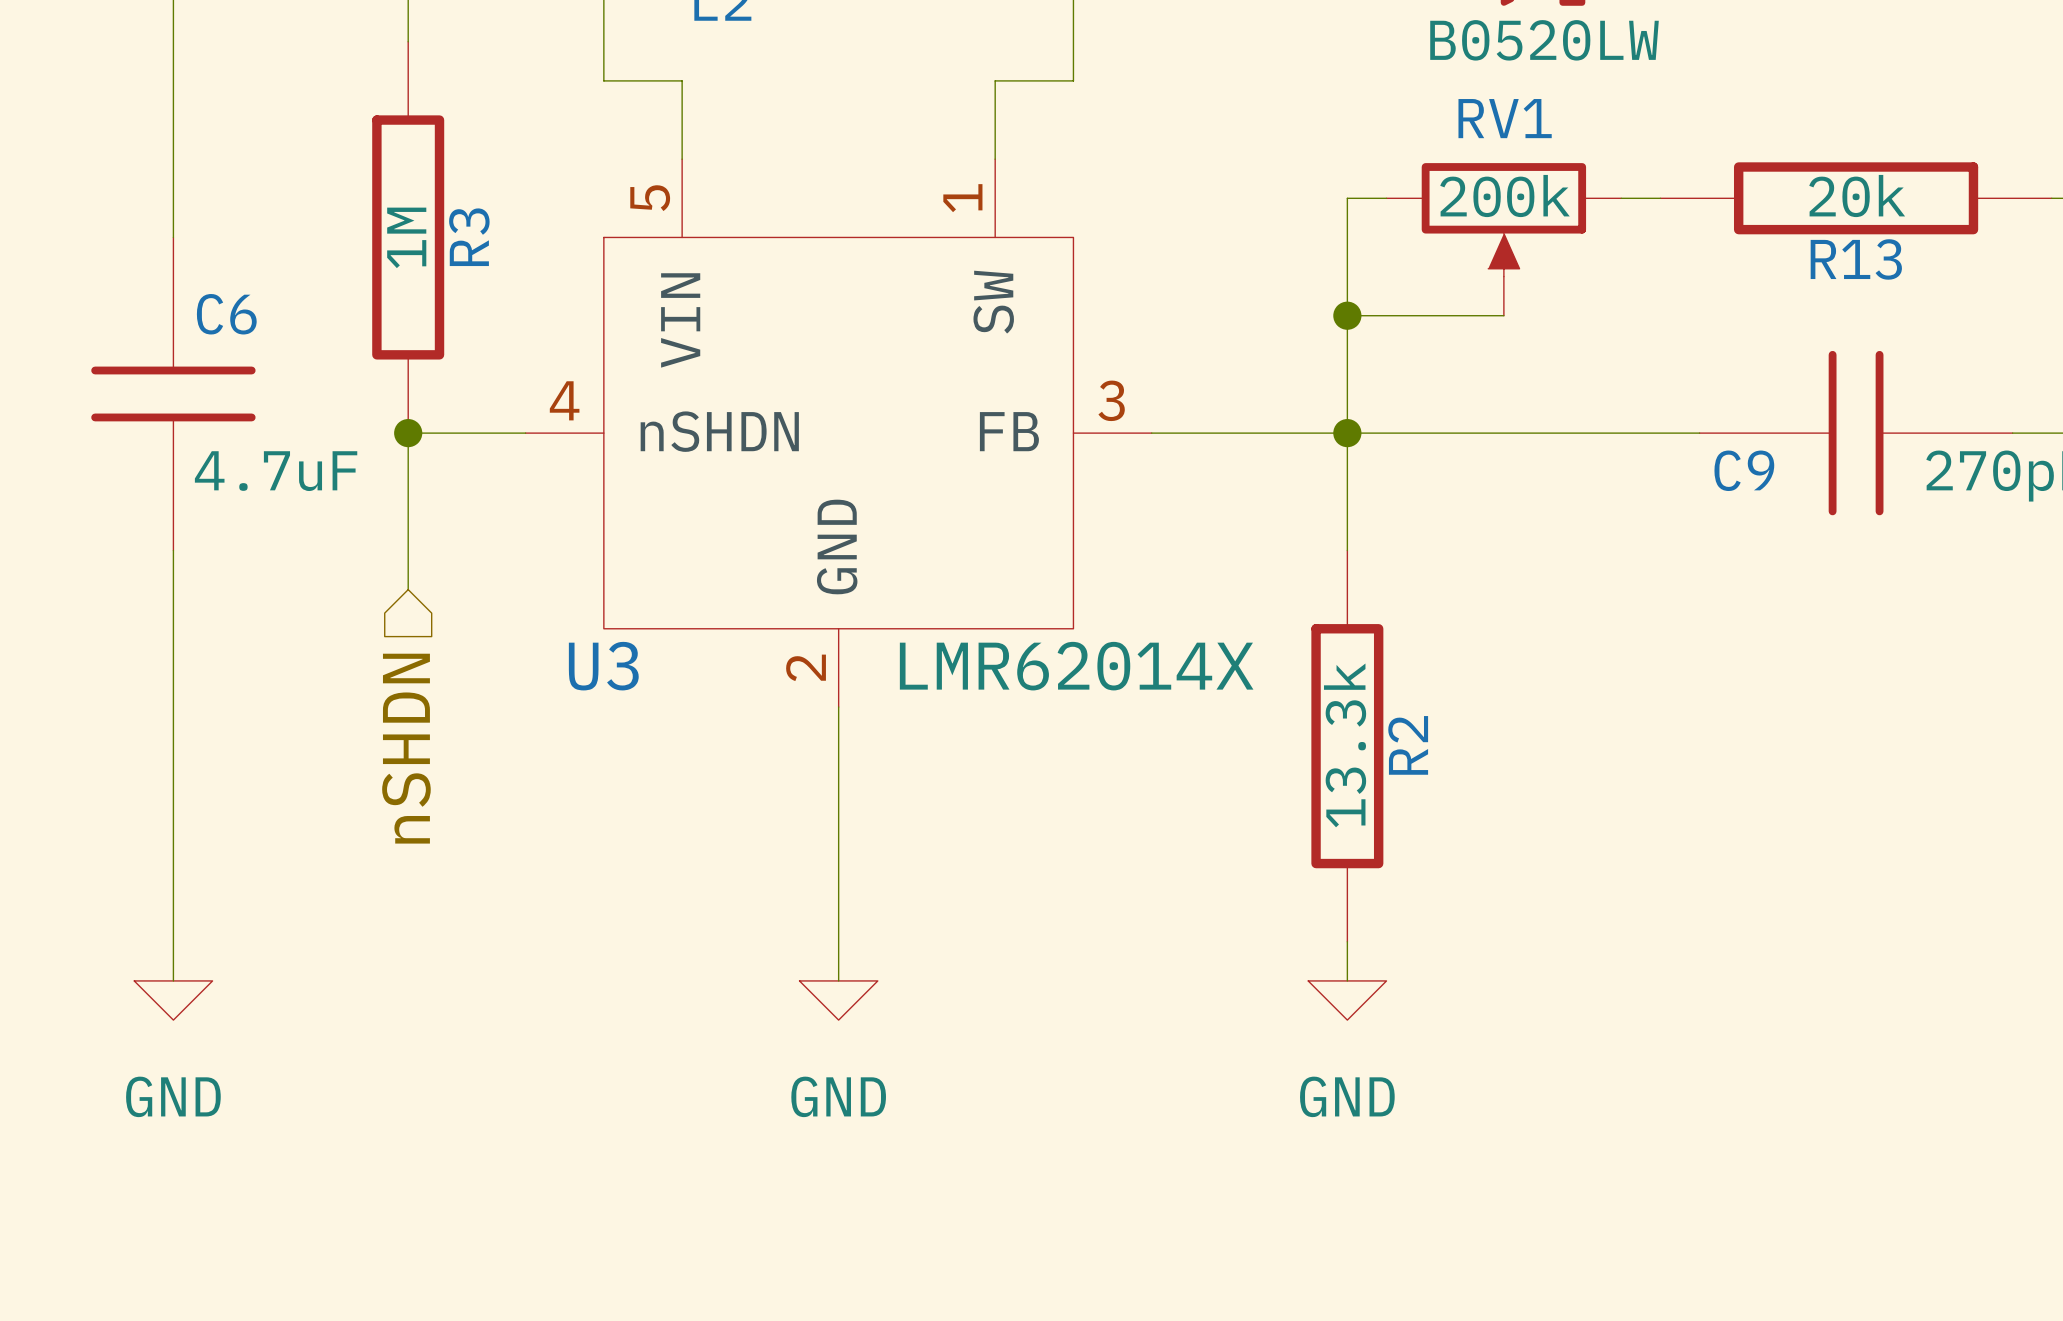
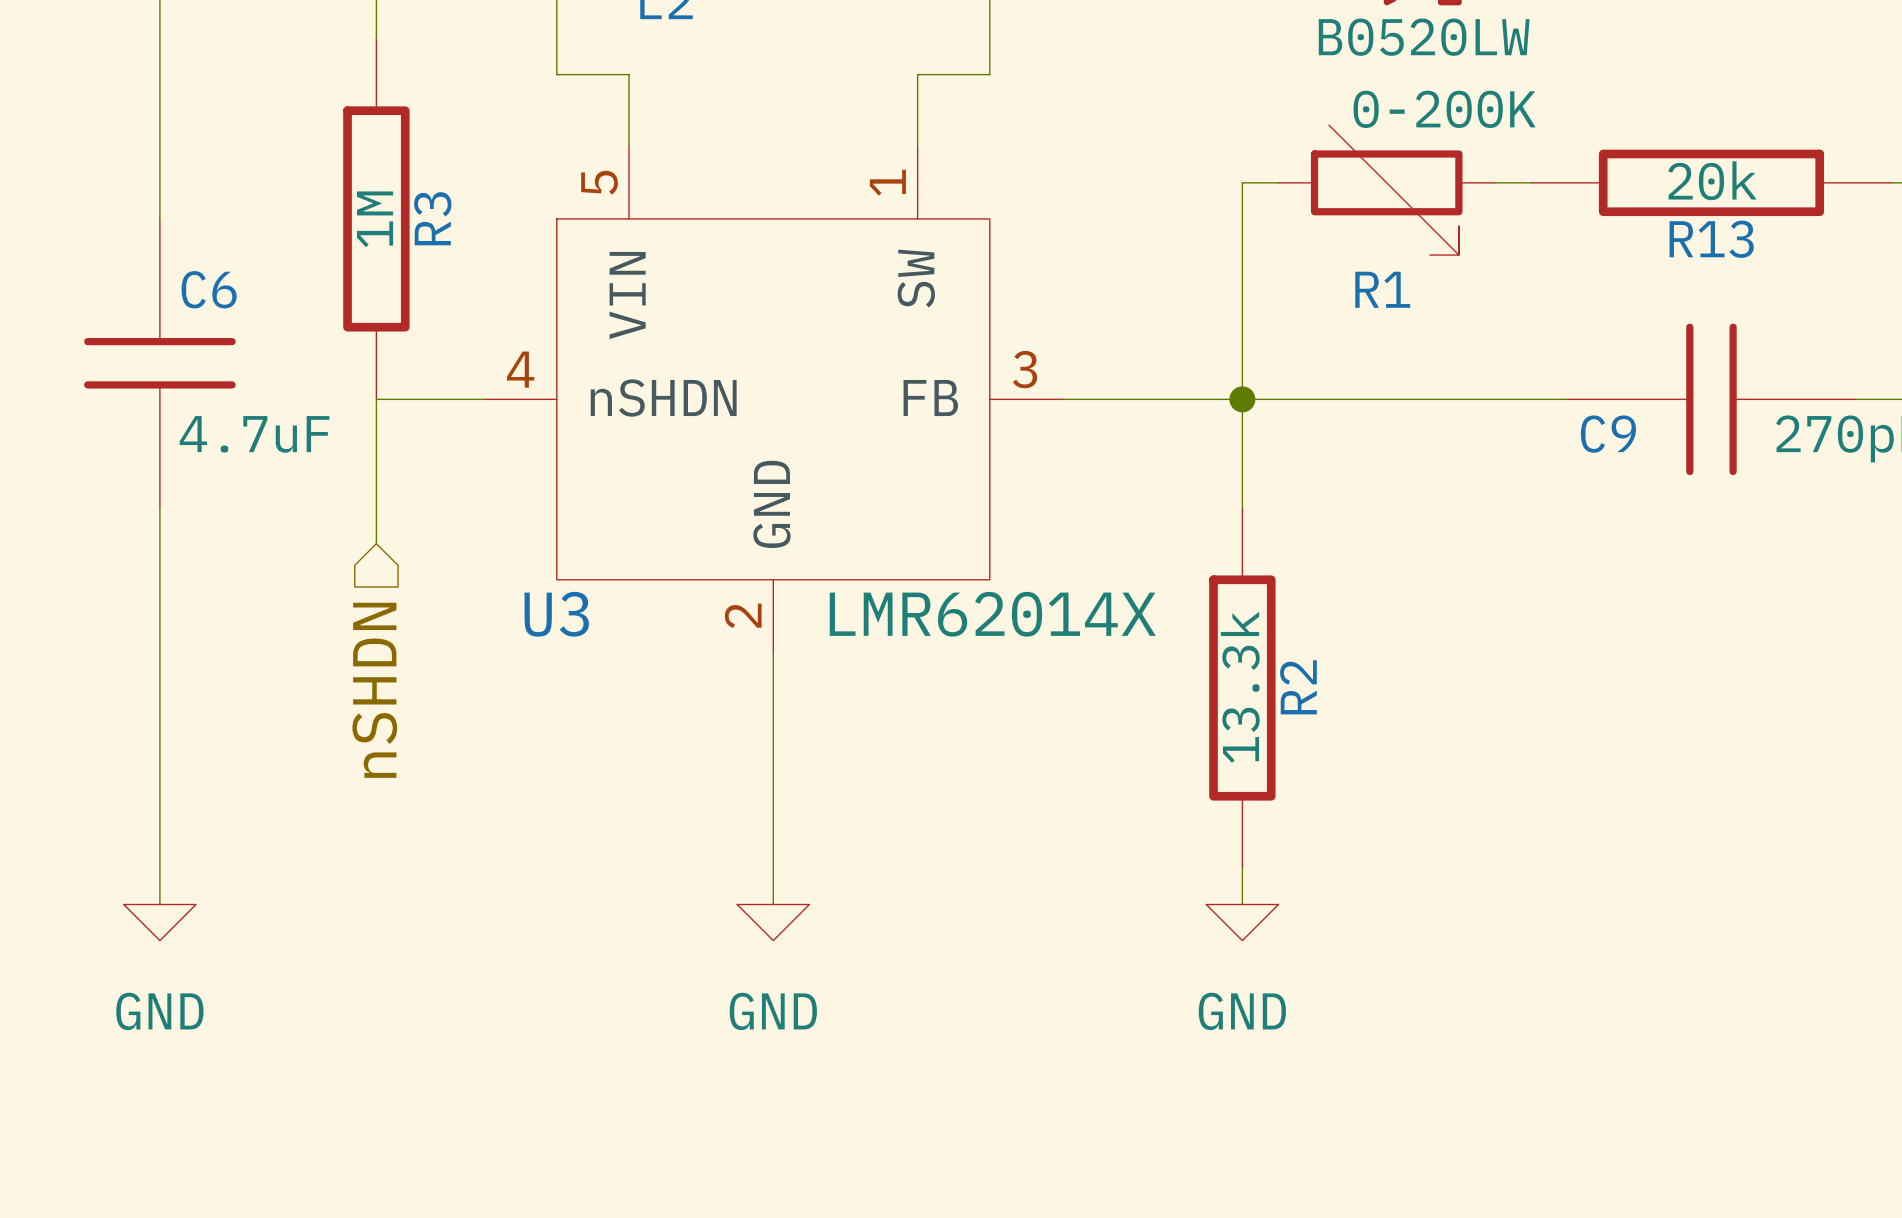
R1: none -> 0-200K (1386, 190)
RV1: 200k (1503, 239) -> none
wire: (1347, 315) (1503, 315) -> none
junction: (1347, 315) -> none
junction: (408, 433) -> none

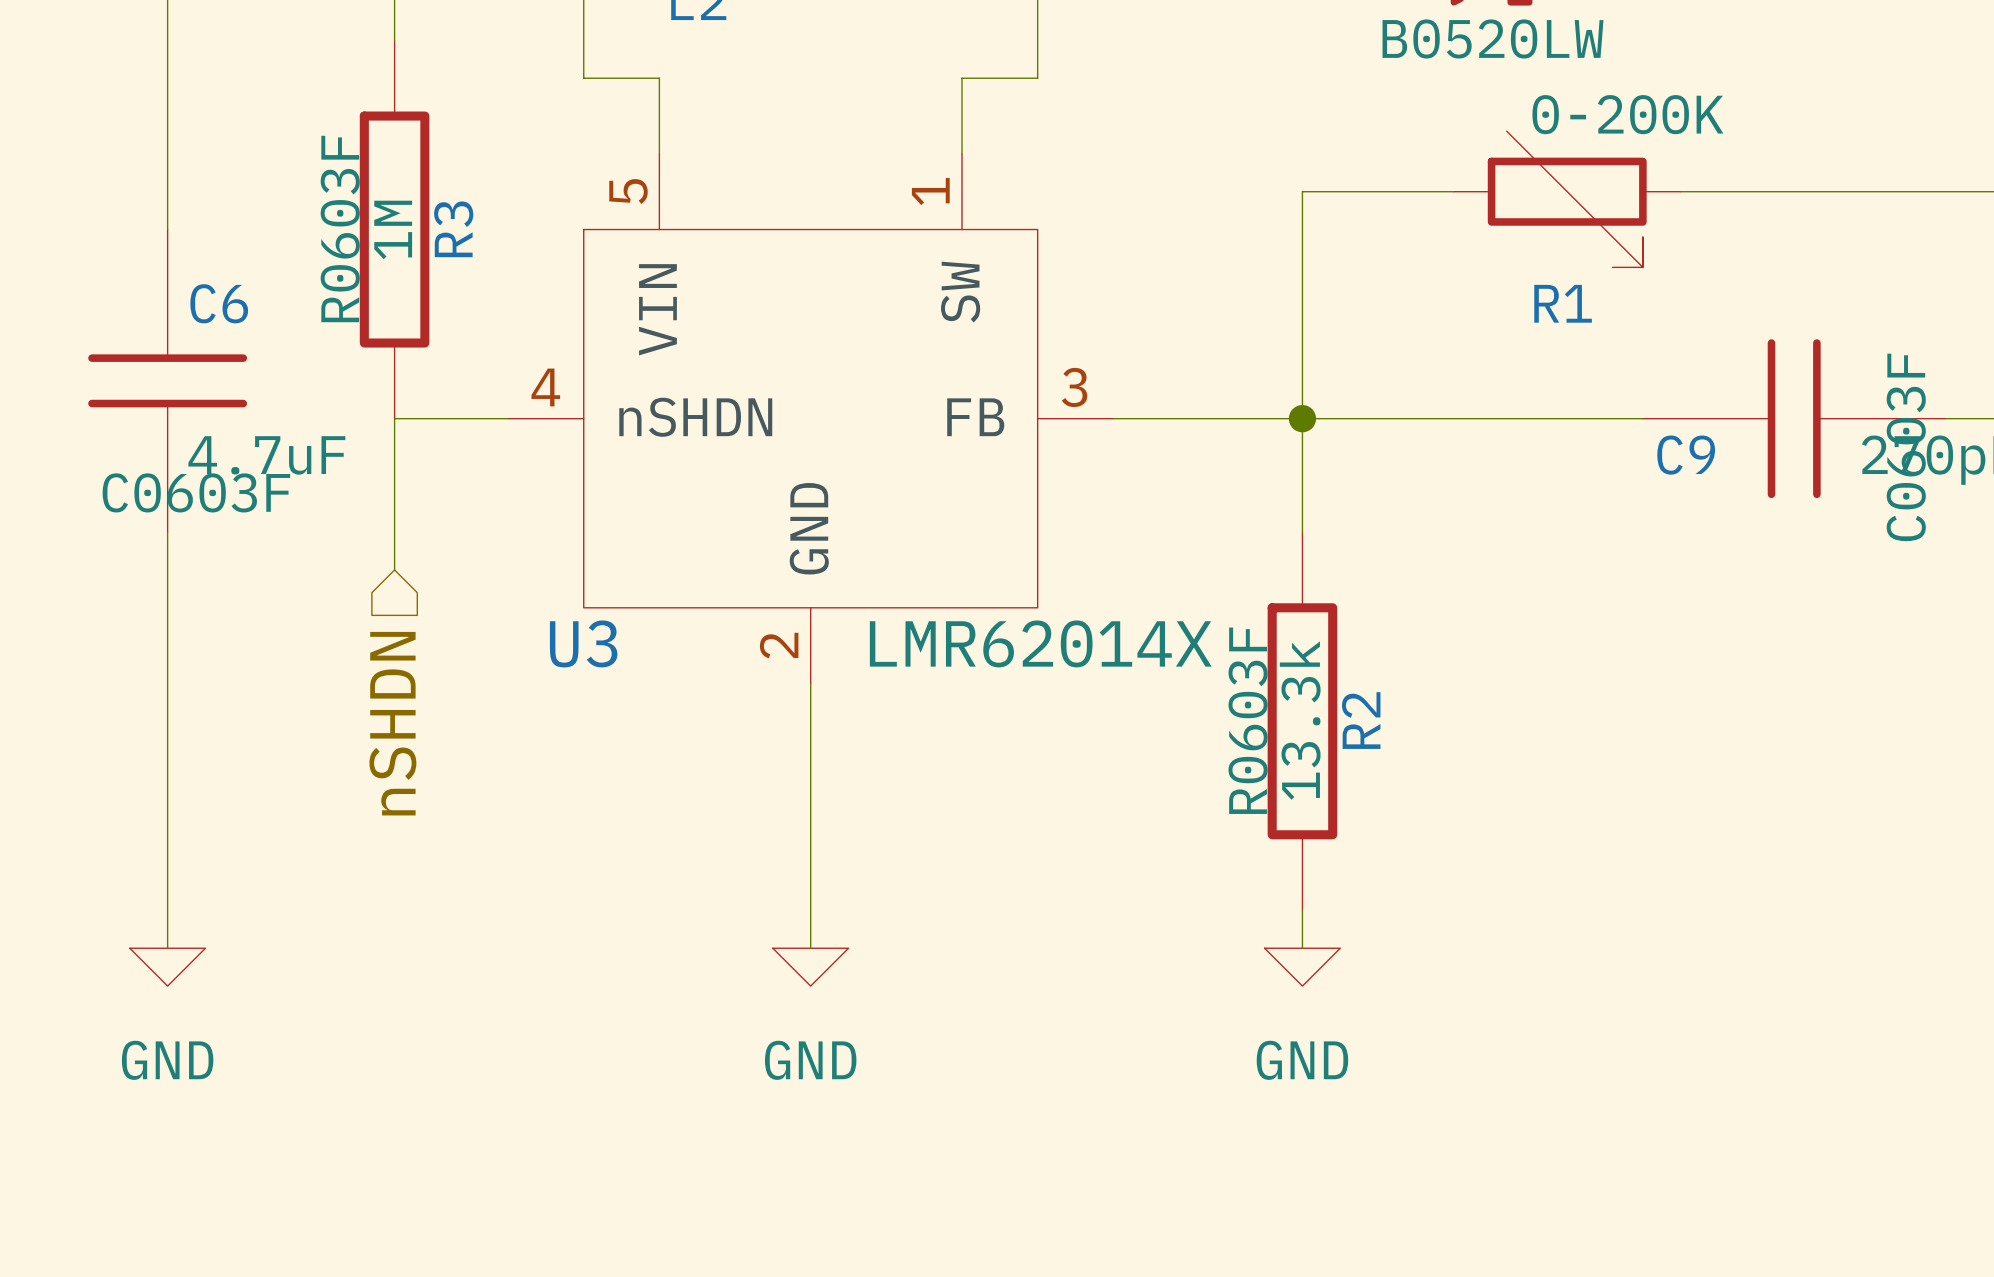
wire: none -> (1340, 191) (1453, 191)
wire: (1494, 182) (1531, 182) -> none
wire: none -> (1680, 191) (1983, 191)
R13: 20k (1711, 182) -> none
R1 position: (1386, 190) -> (1567, 199)
R3 text: none -> R0603F (340, 228)
C9 text: none -> C0603F (1906, 447)
C6 text: none -> C0603F (196, 492)
R2 text: none -> R0603F (1248, 720)

